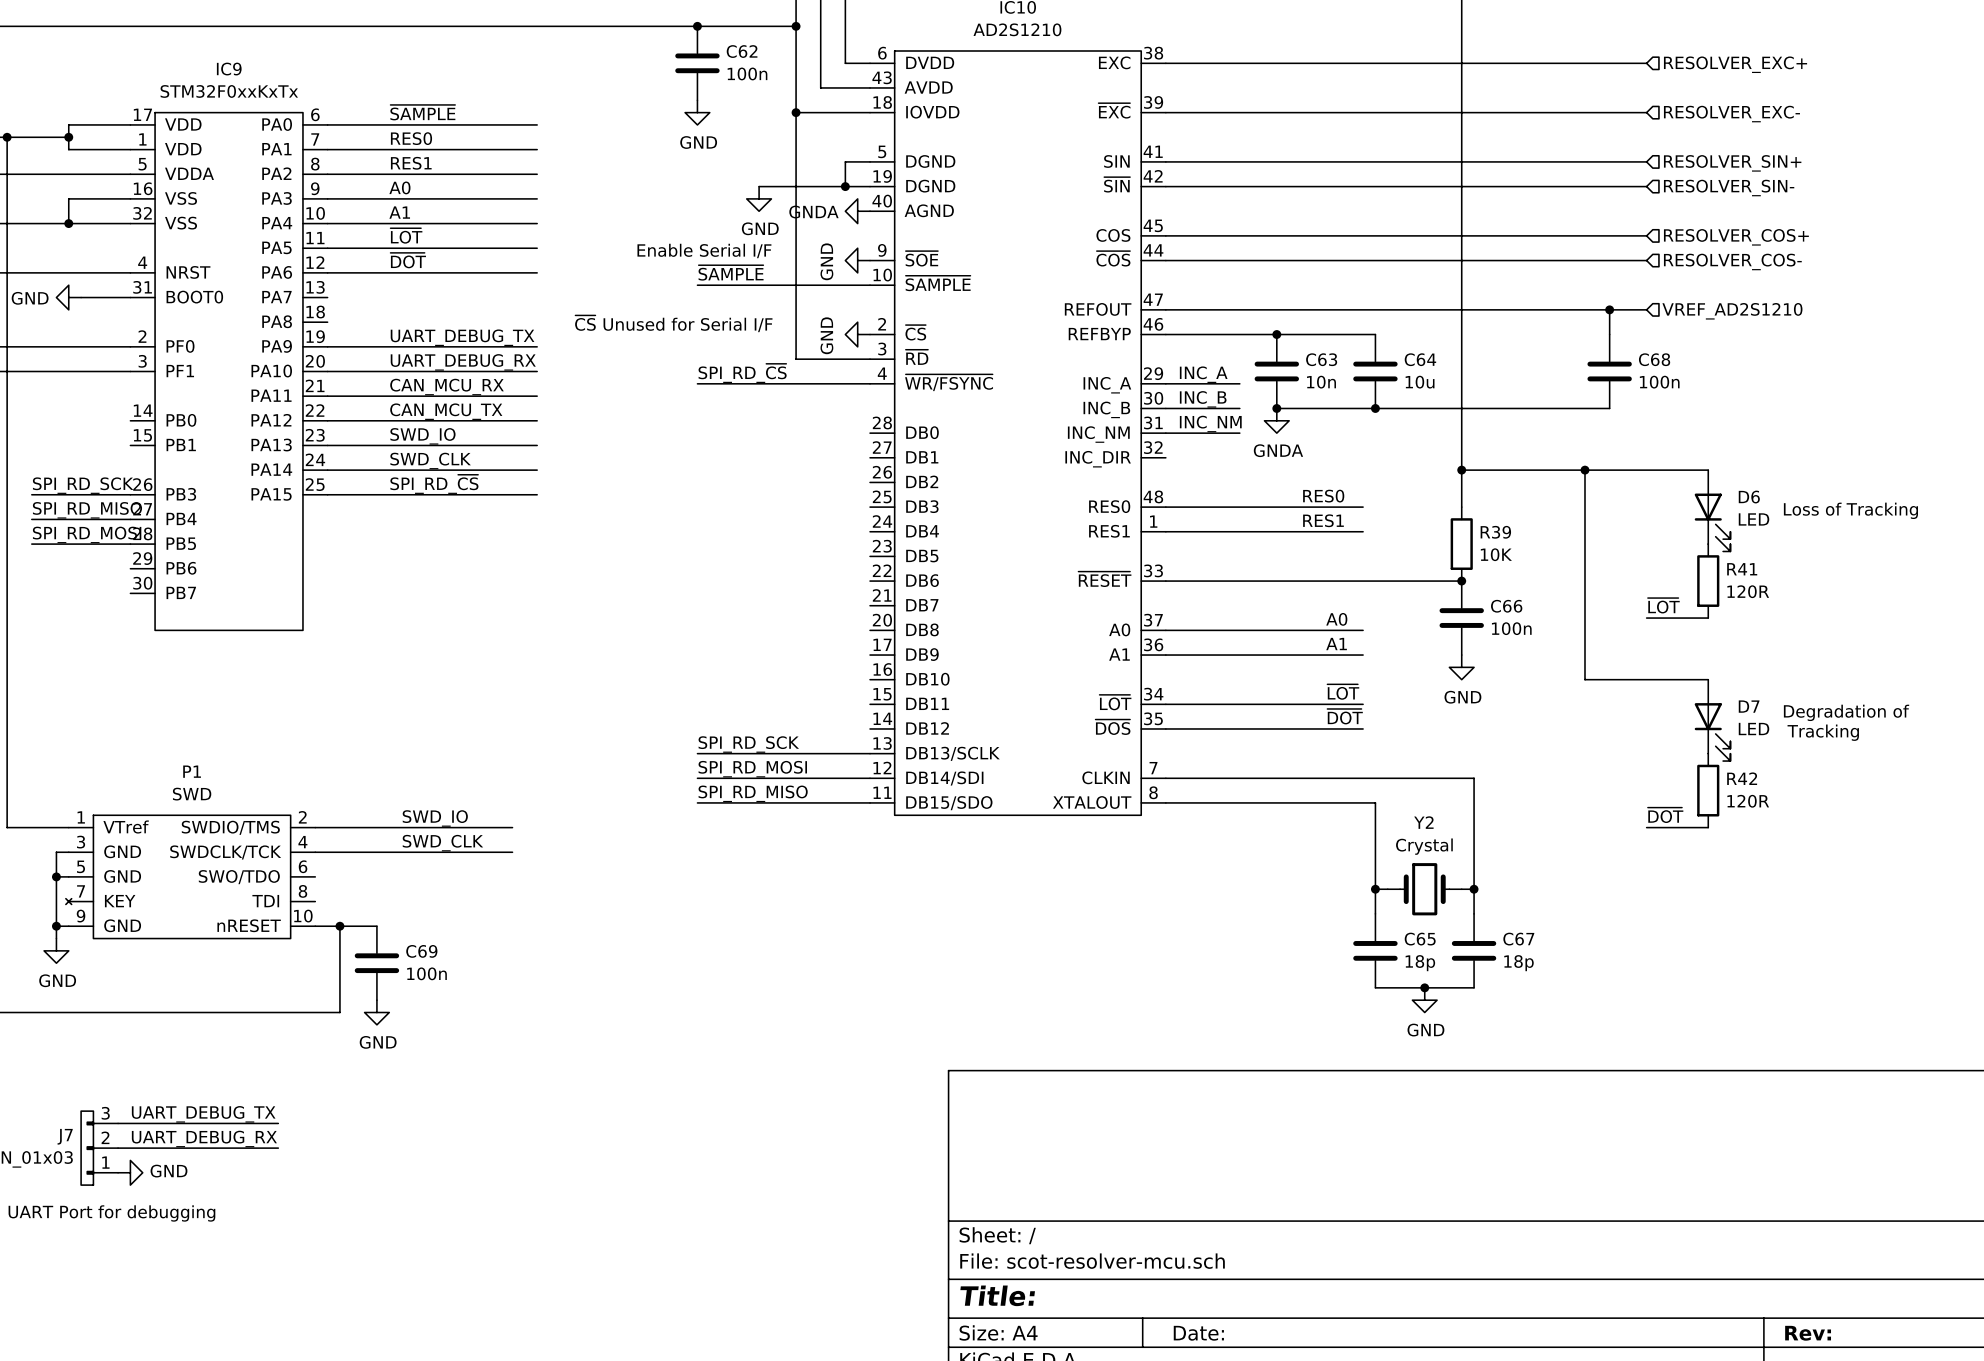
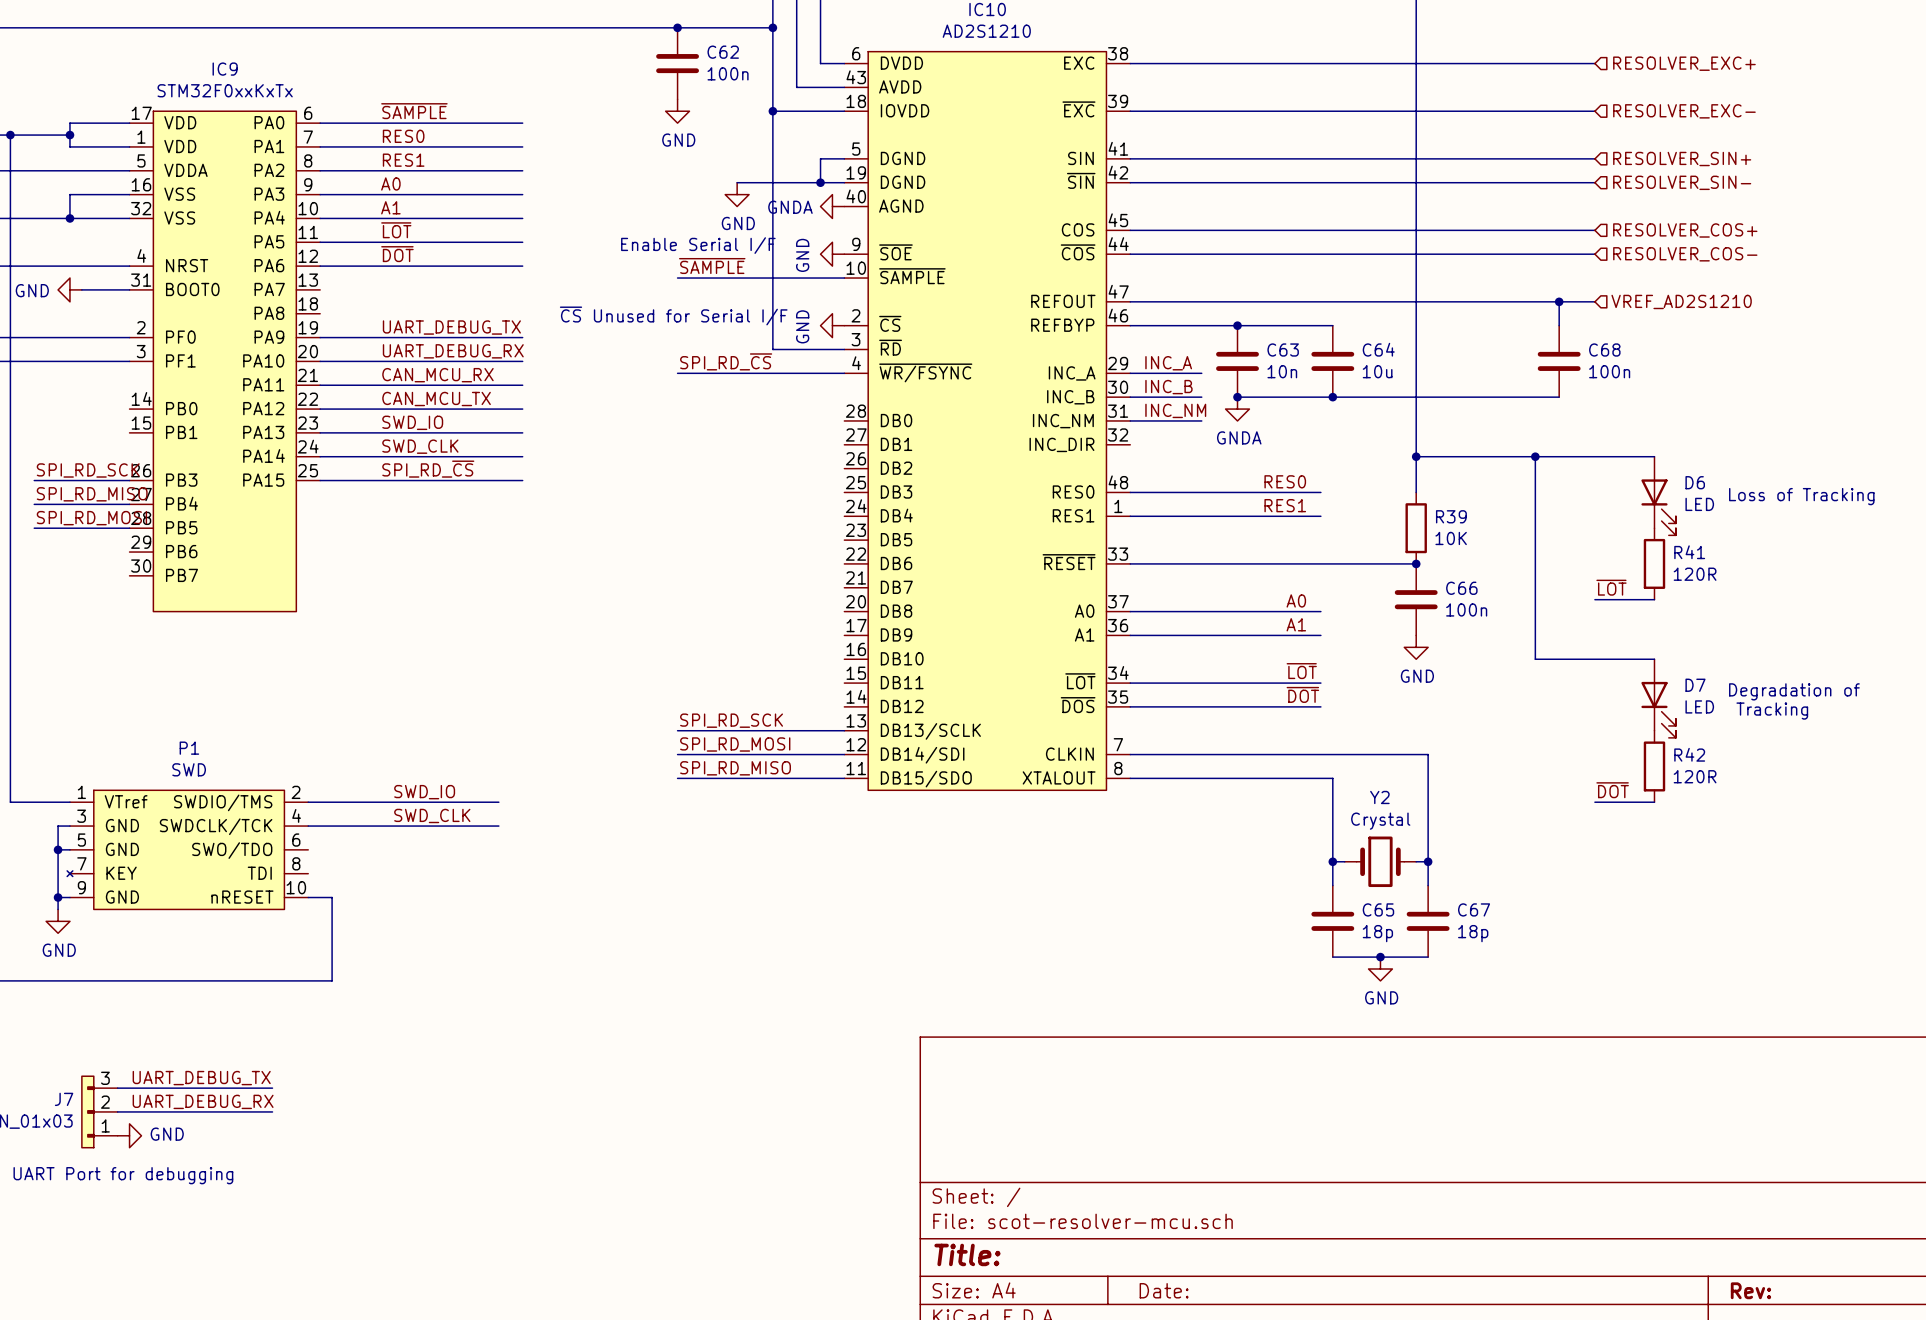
wire: (339, 926) (376, 926) -> none
junction: (339, 926) -> none
C69: 100n (376, 963) -> none
power symbol: GND (376, 1012) -> none

